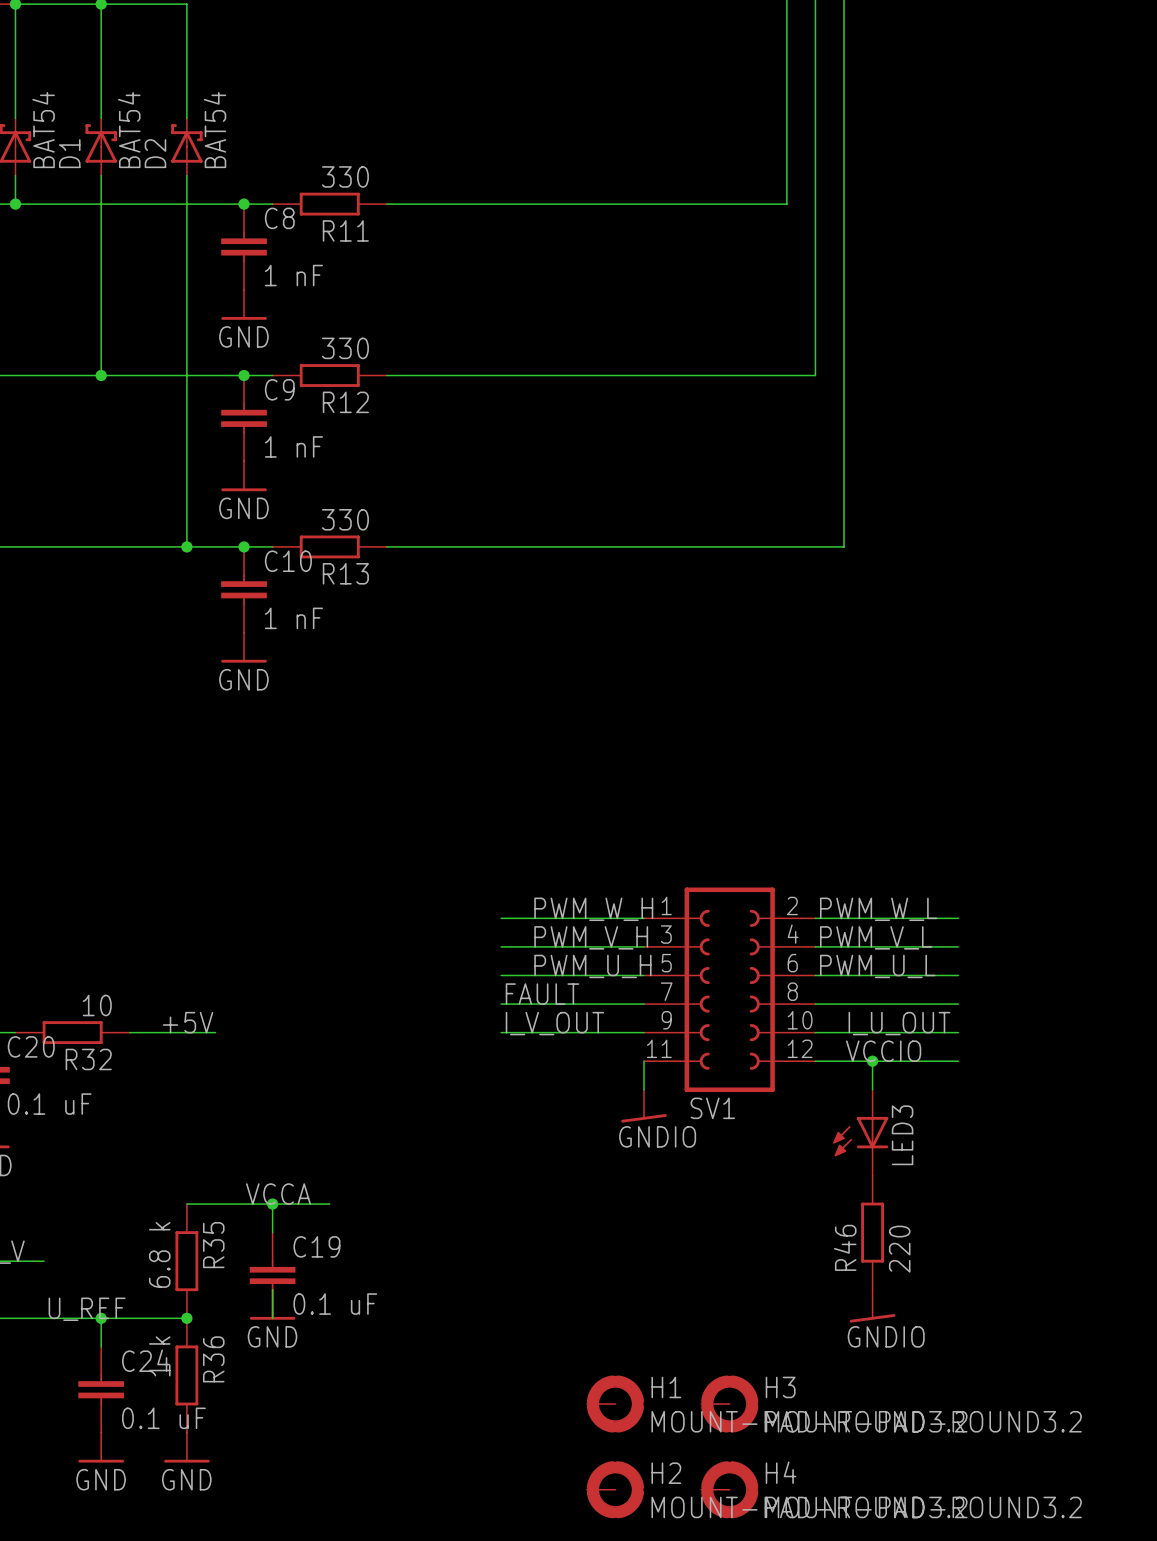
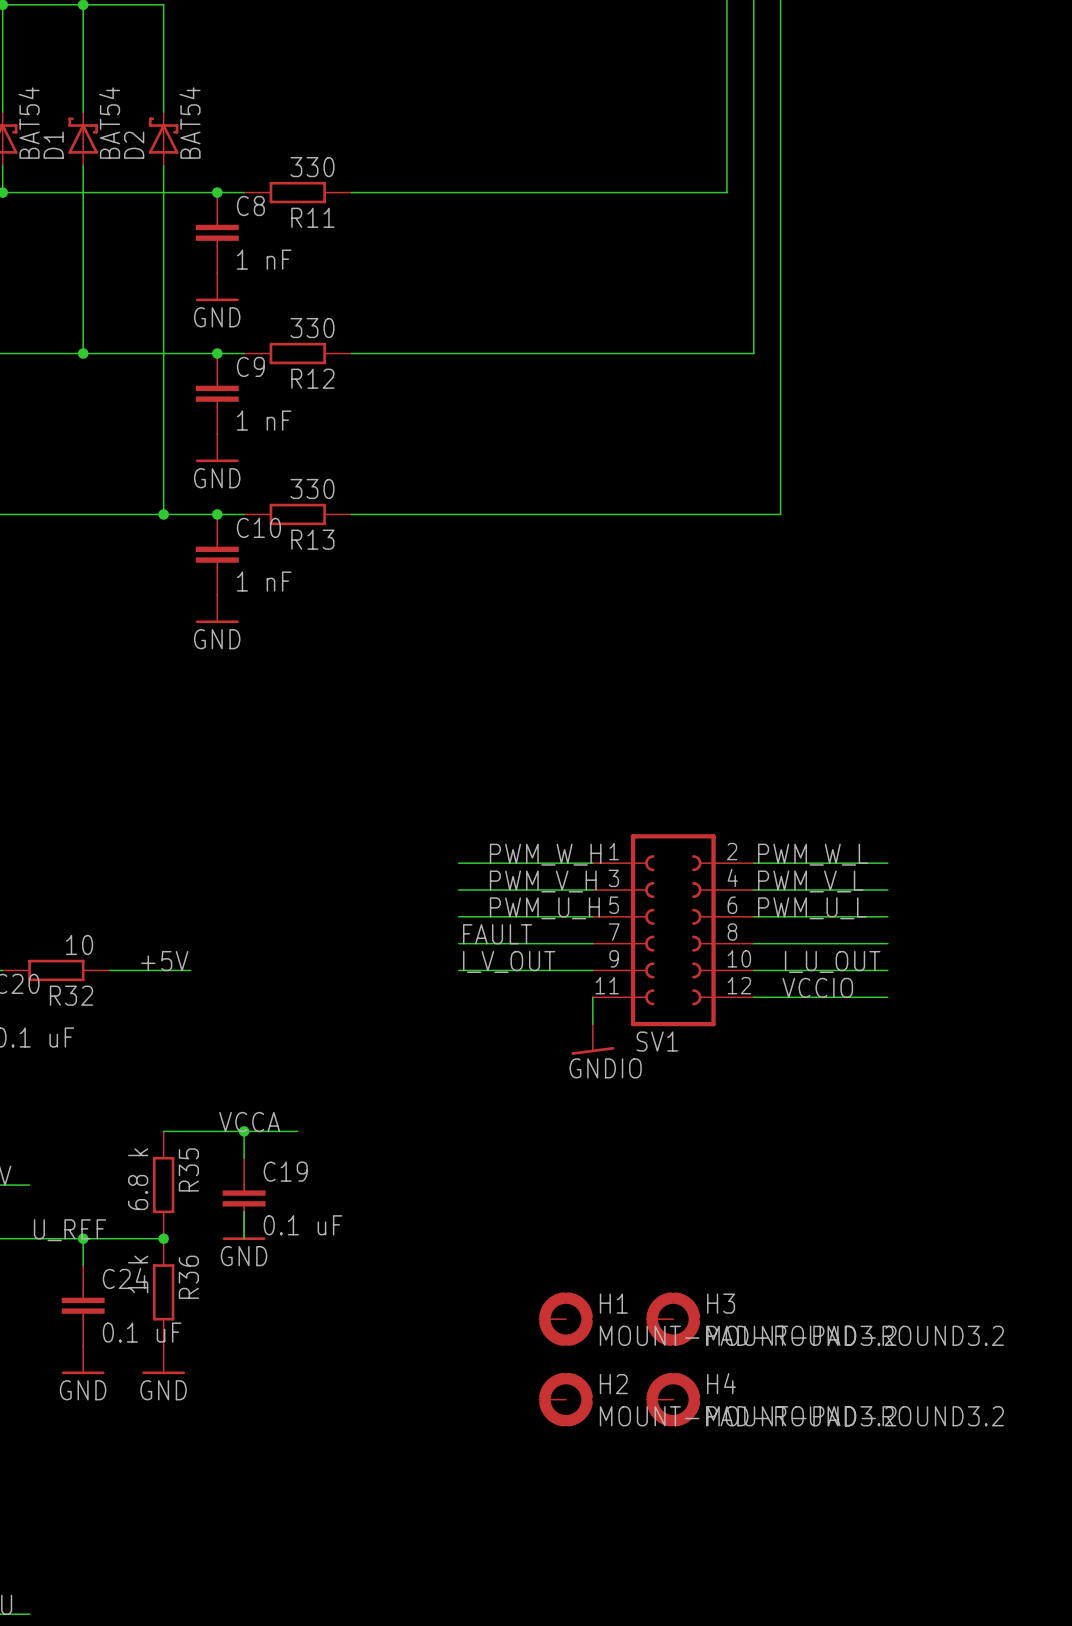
wire: (872, 1061) (872, 1089) -> none
junction: (872, 1061) -> none
LED3: (860, 1132) -> none
R46: 220 (872, 1232) -> none
power symbol: GNDIO (872, 1306) -> none

